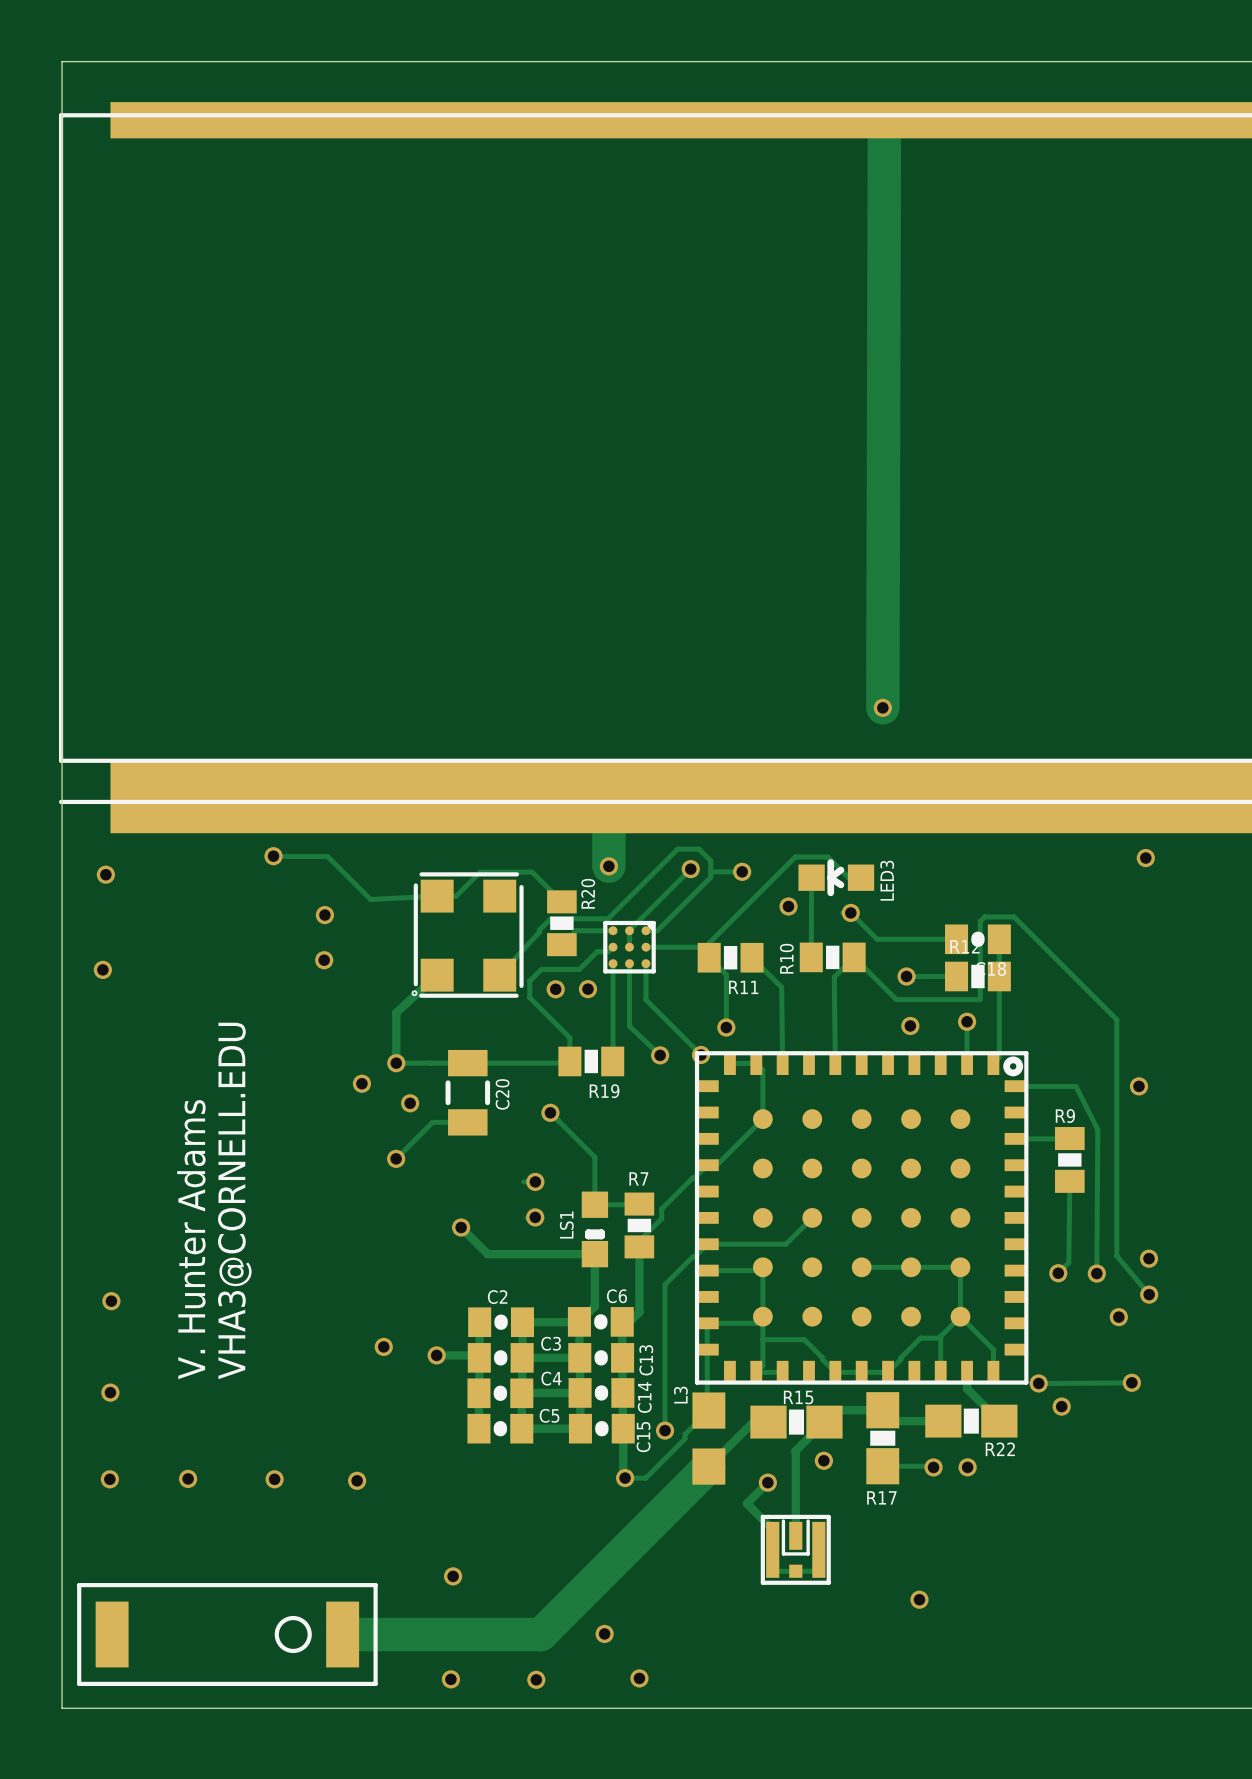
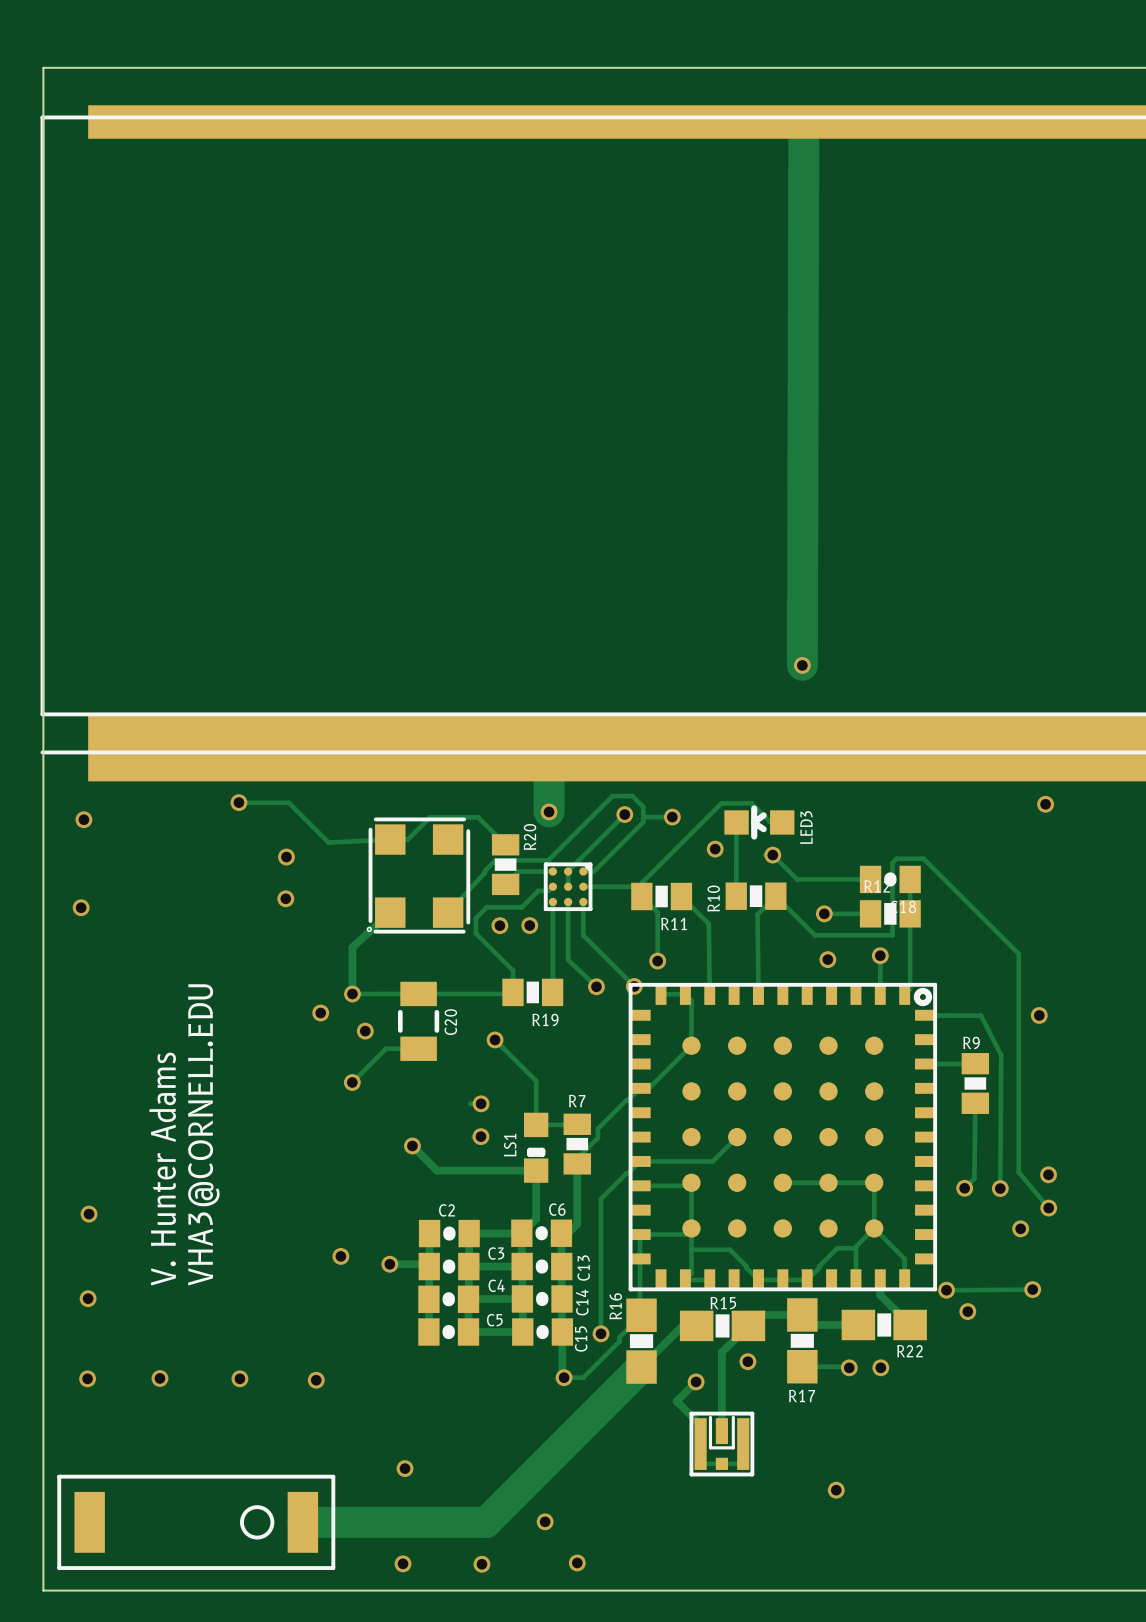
L3: (708, 1438) -> none
R16: none -> (641, 1341)

